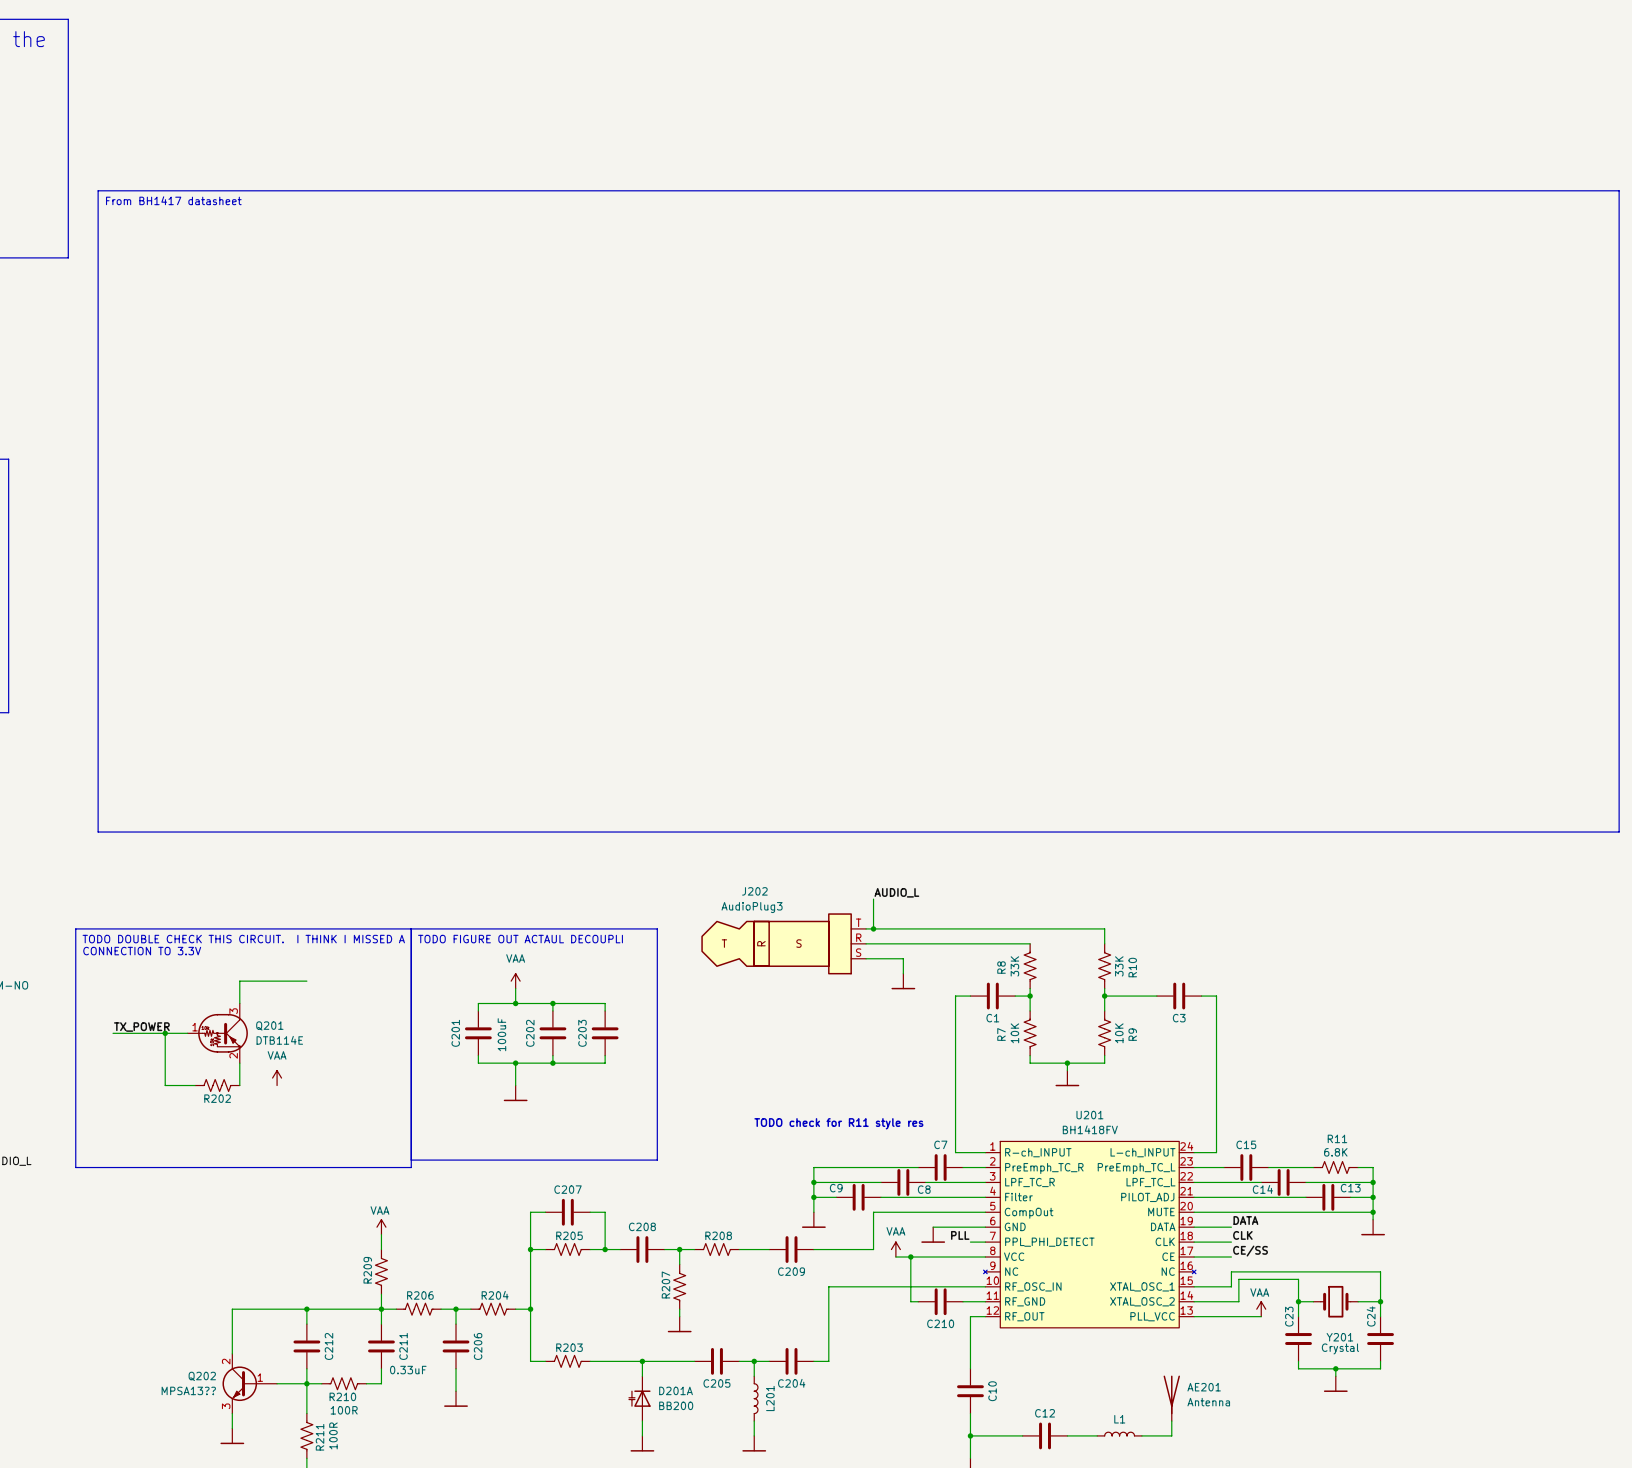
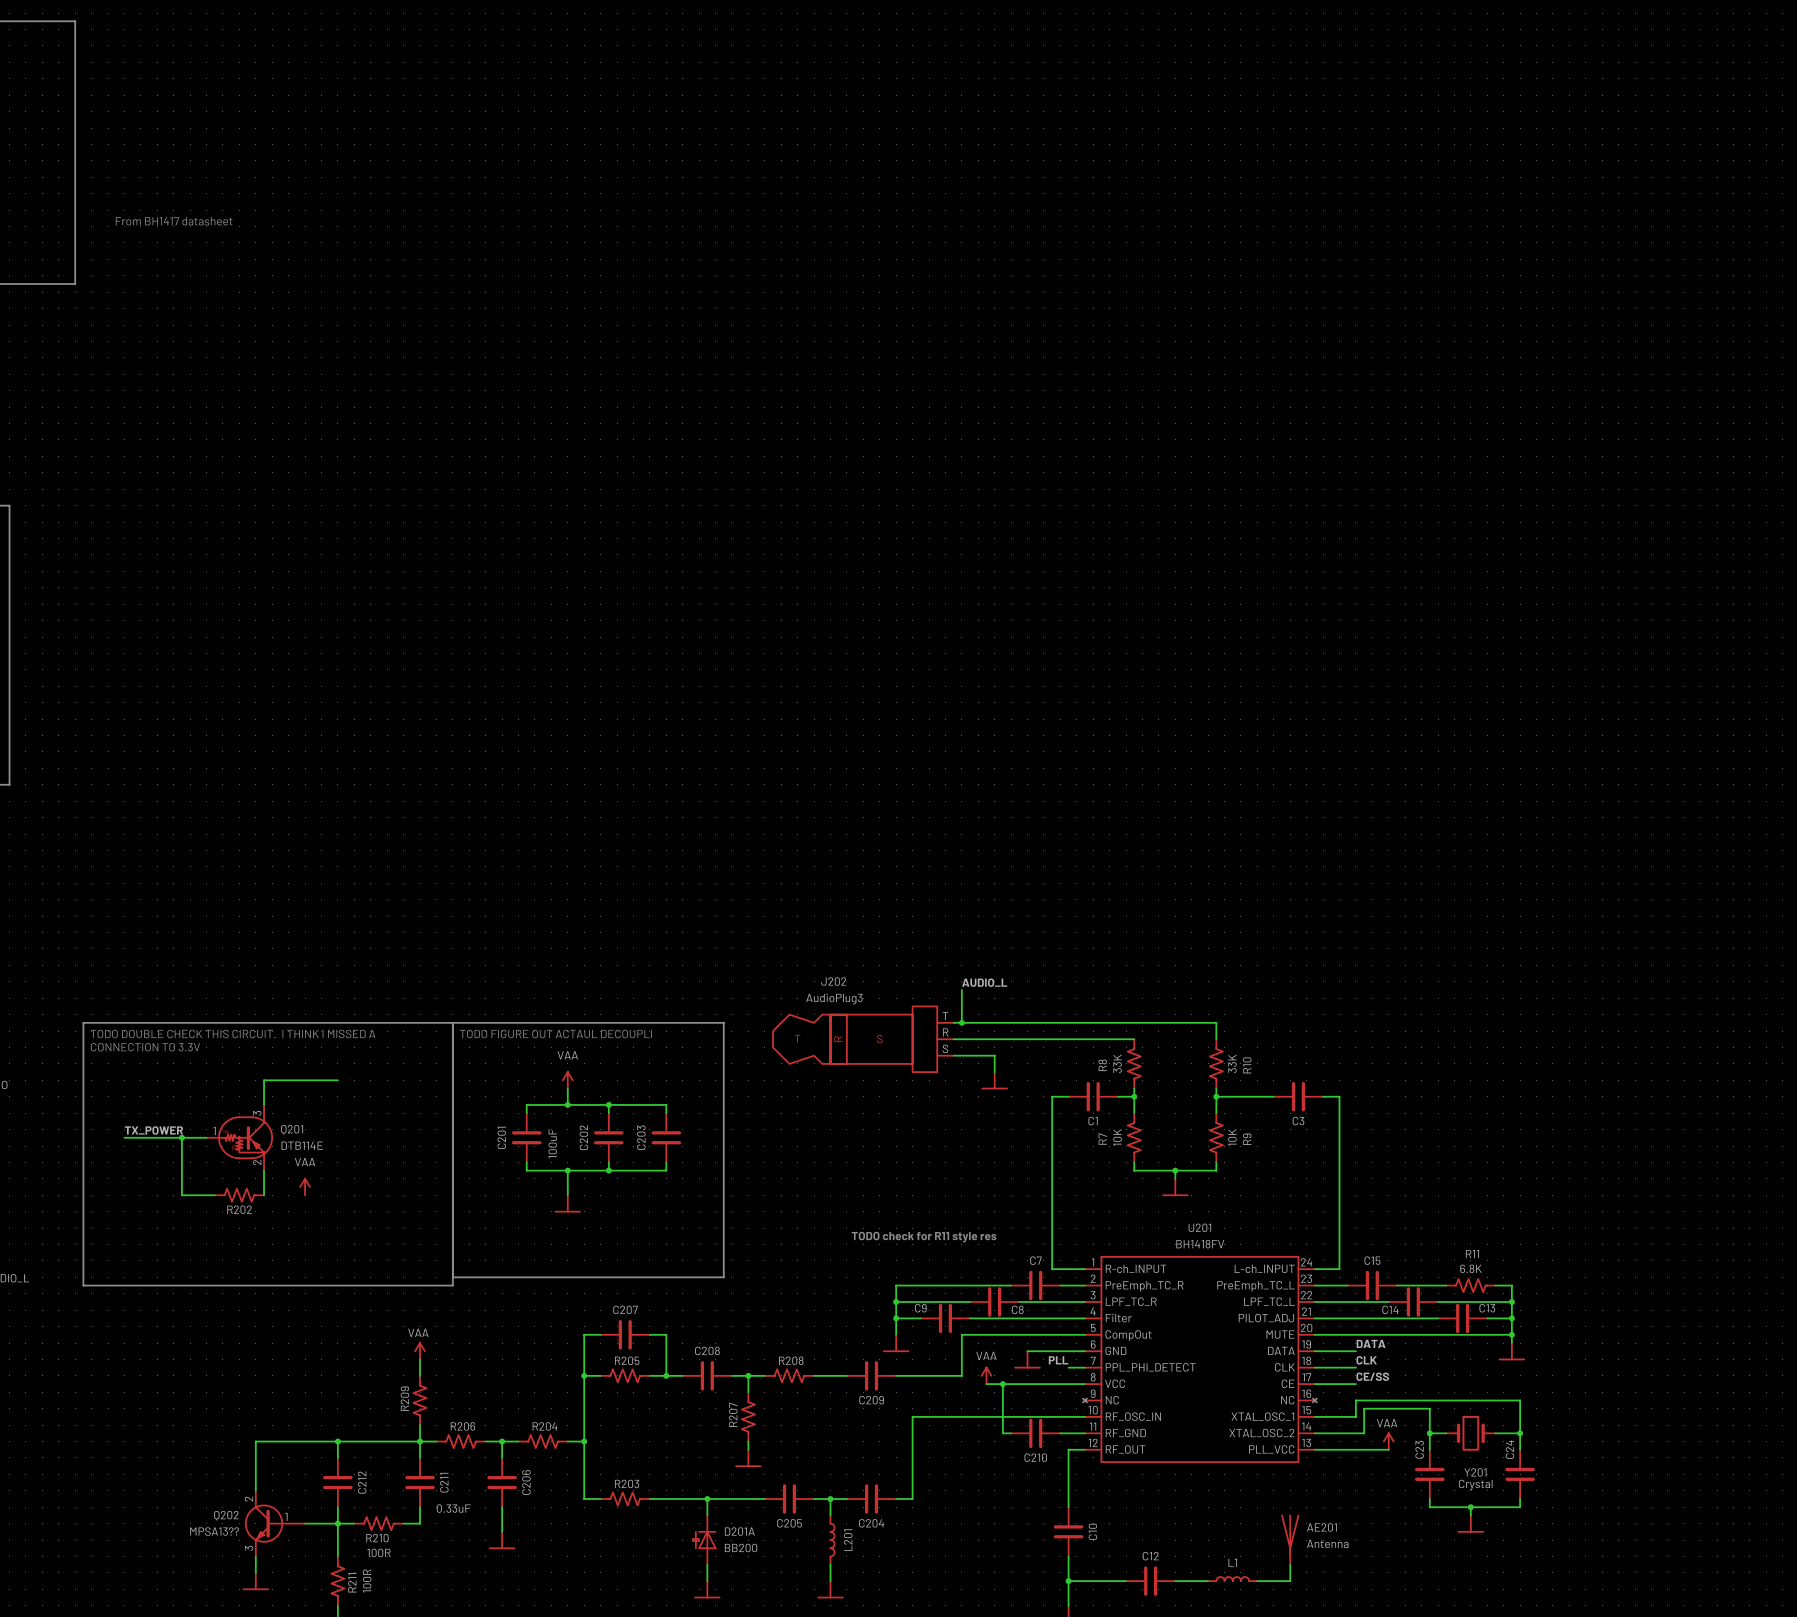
line: (98, 190) (1619, 190) (1619, 832) (98, 832) (98, 190) -> none

